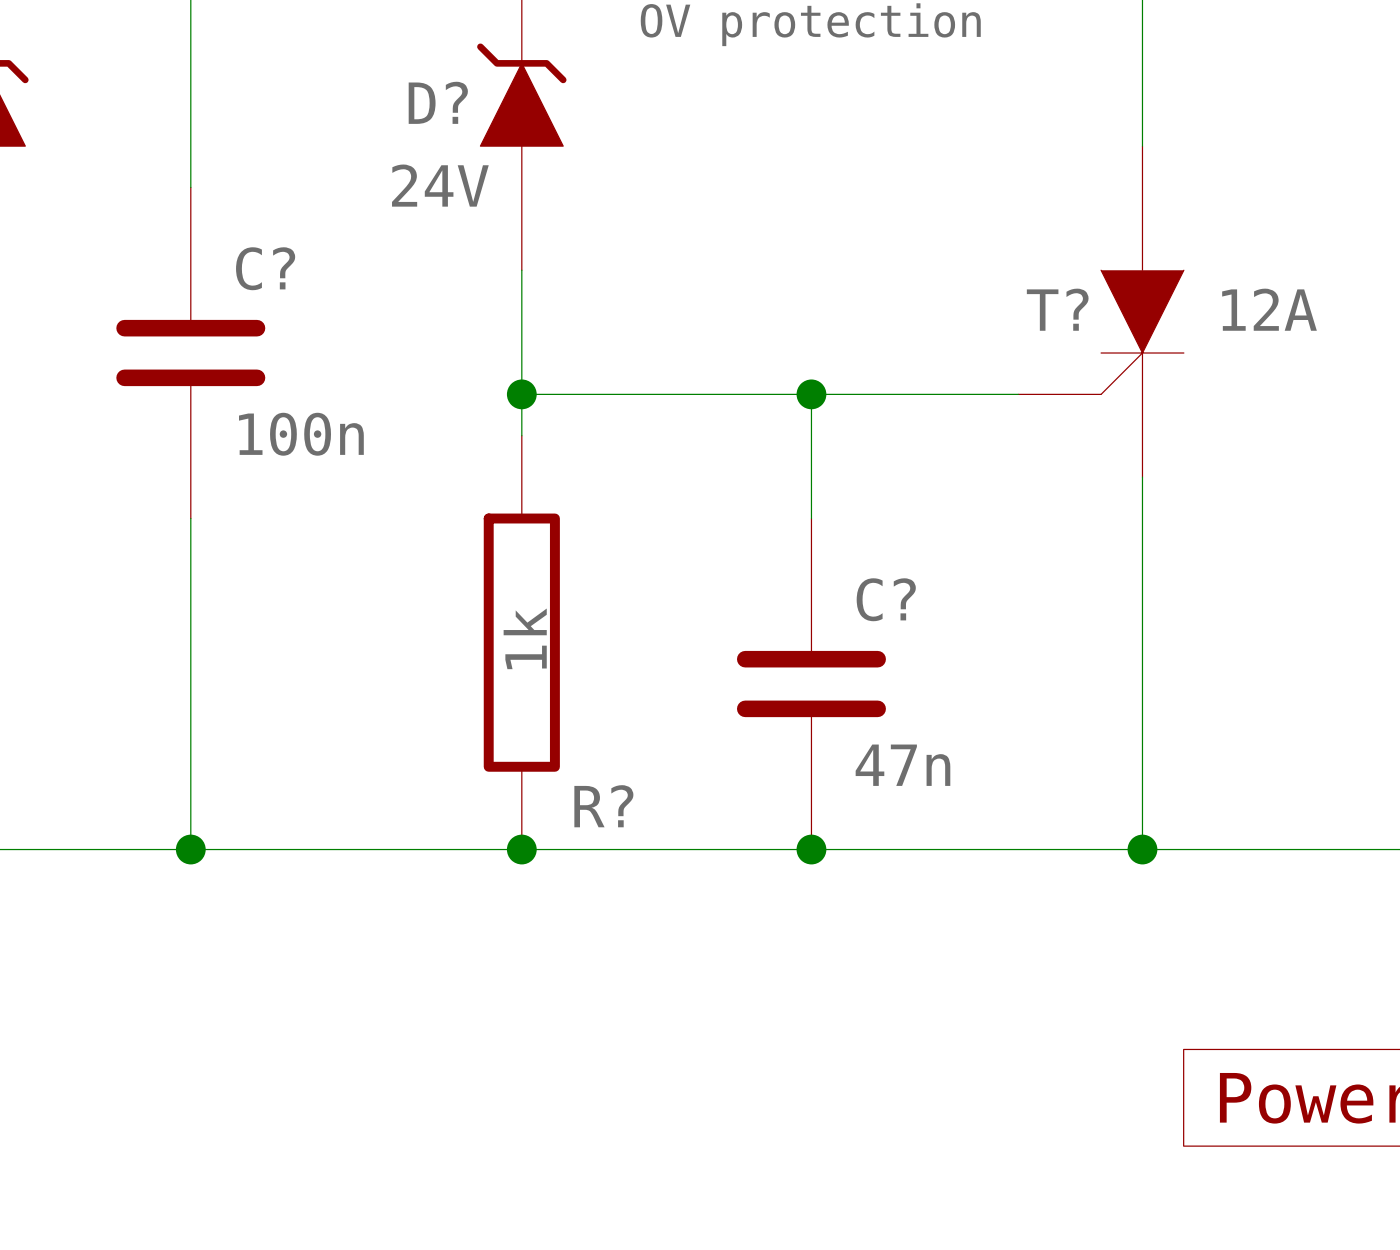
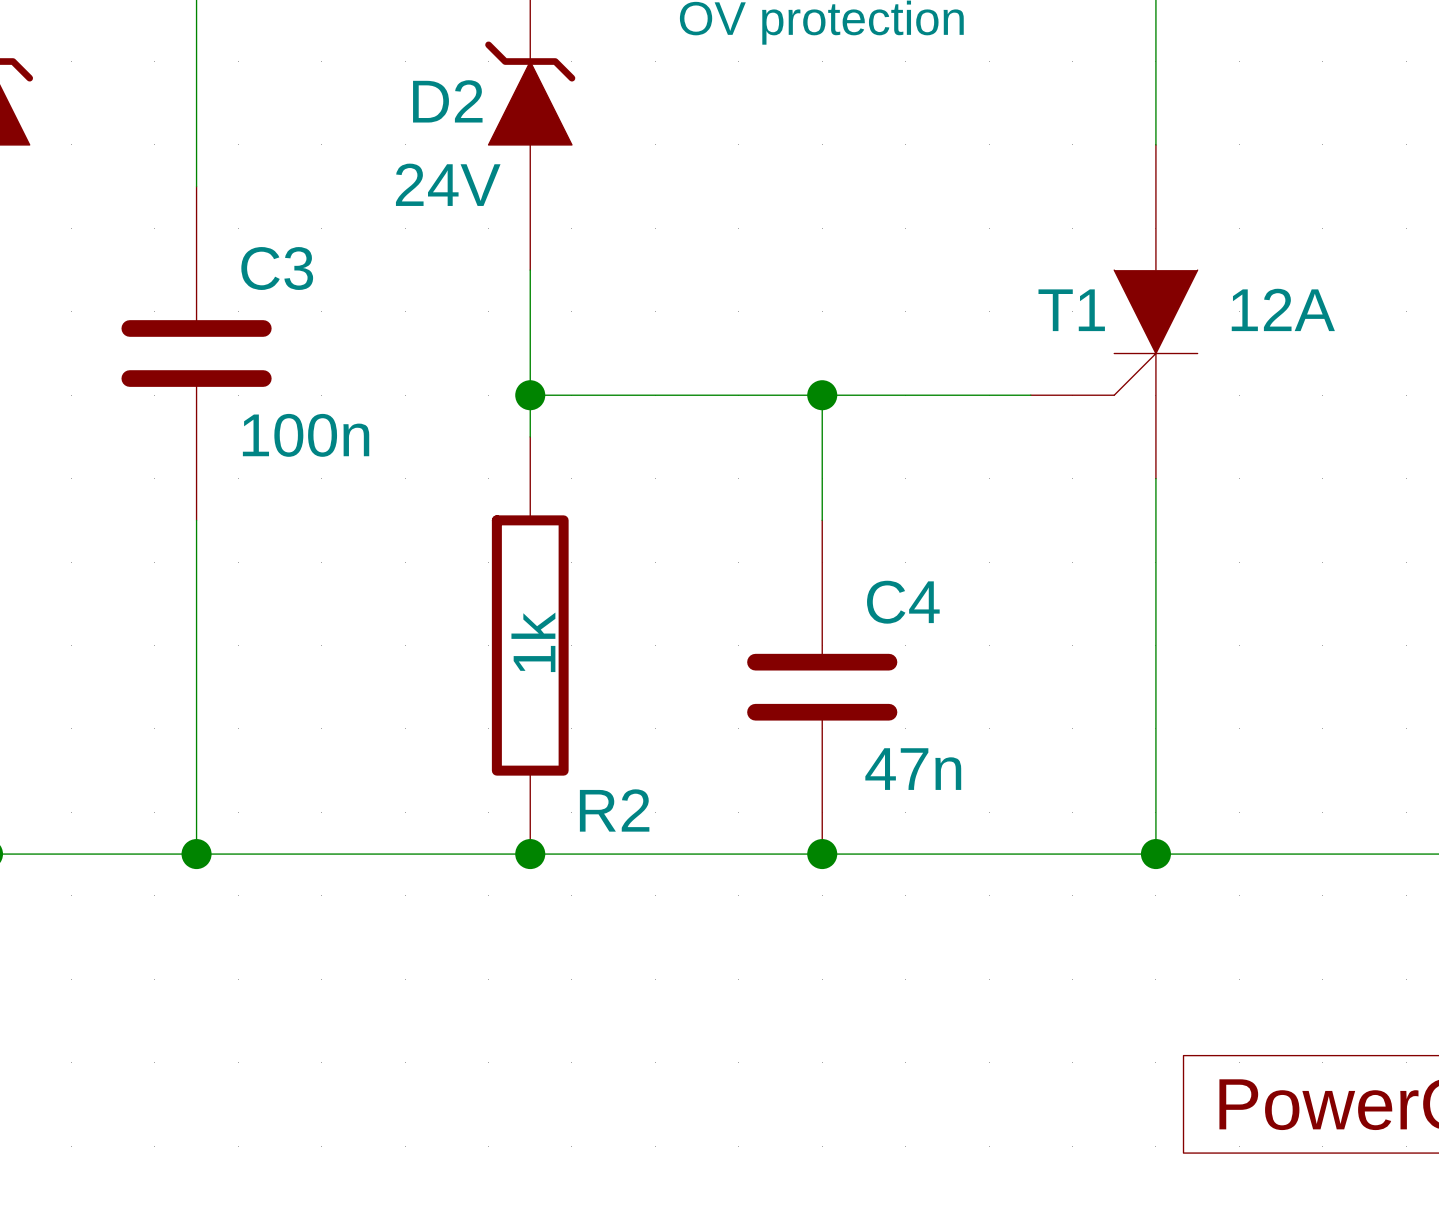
D? name: D? (438, 102) -> D2 (447, 101)
C? name: C? (265, 268) -> C3 (277, 268)
T? name: T? (1057, 309) -> T1 (1071, 310)
C? name: C? (886, 599) -> C4 (903, 602)
R? name: R? (603, 806) -> R2 (614, 810)

